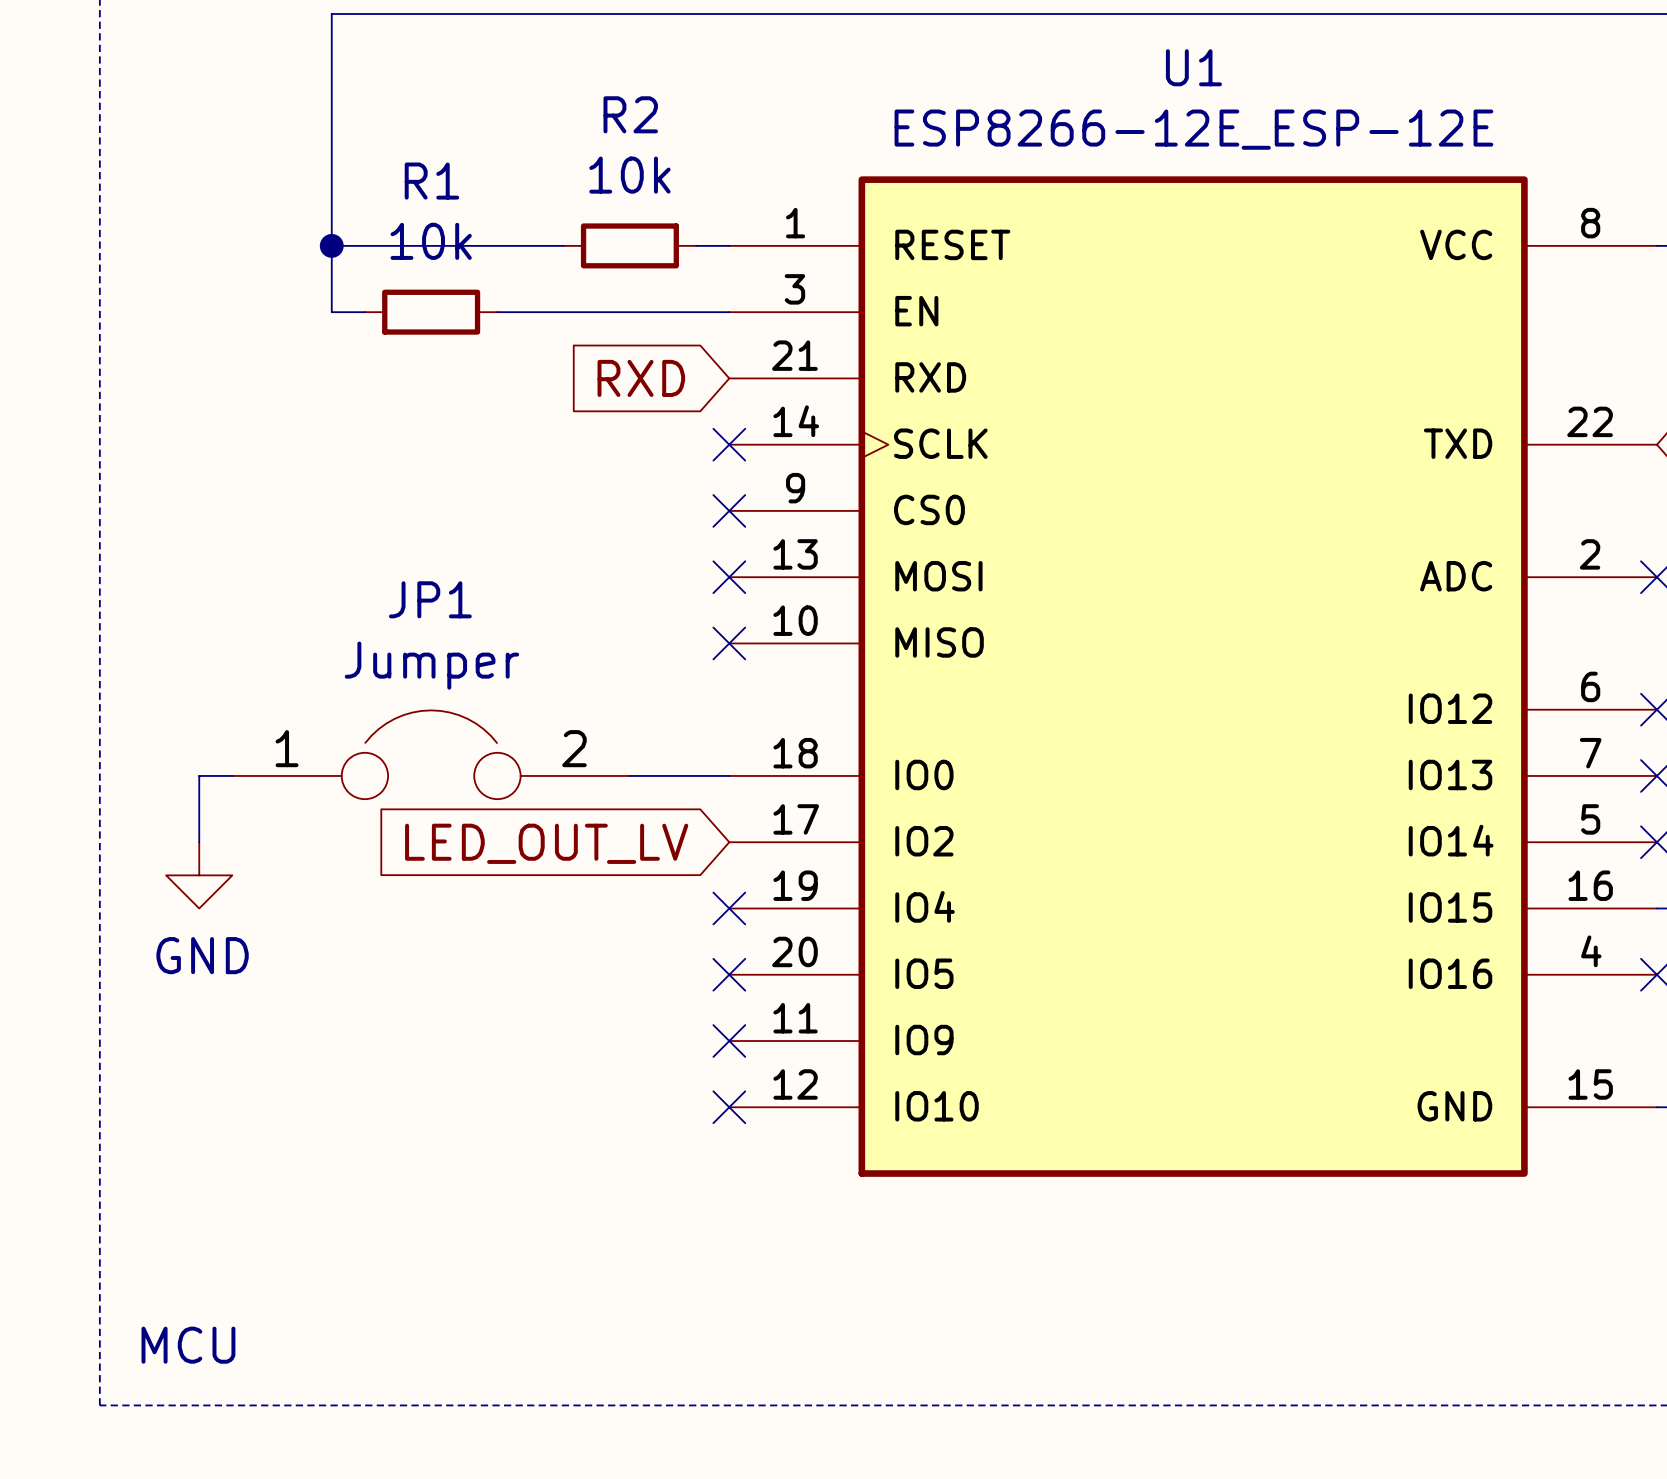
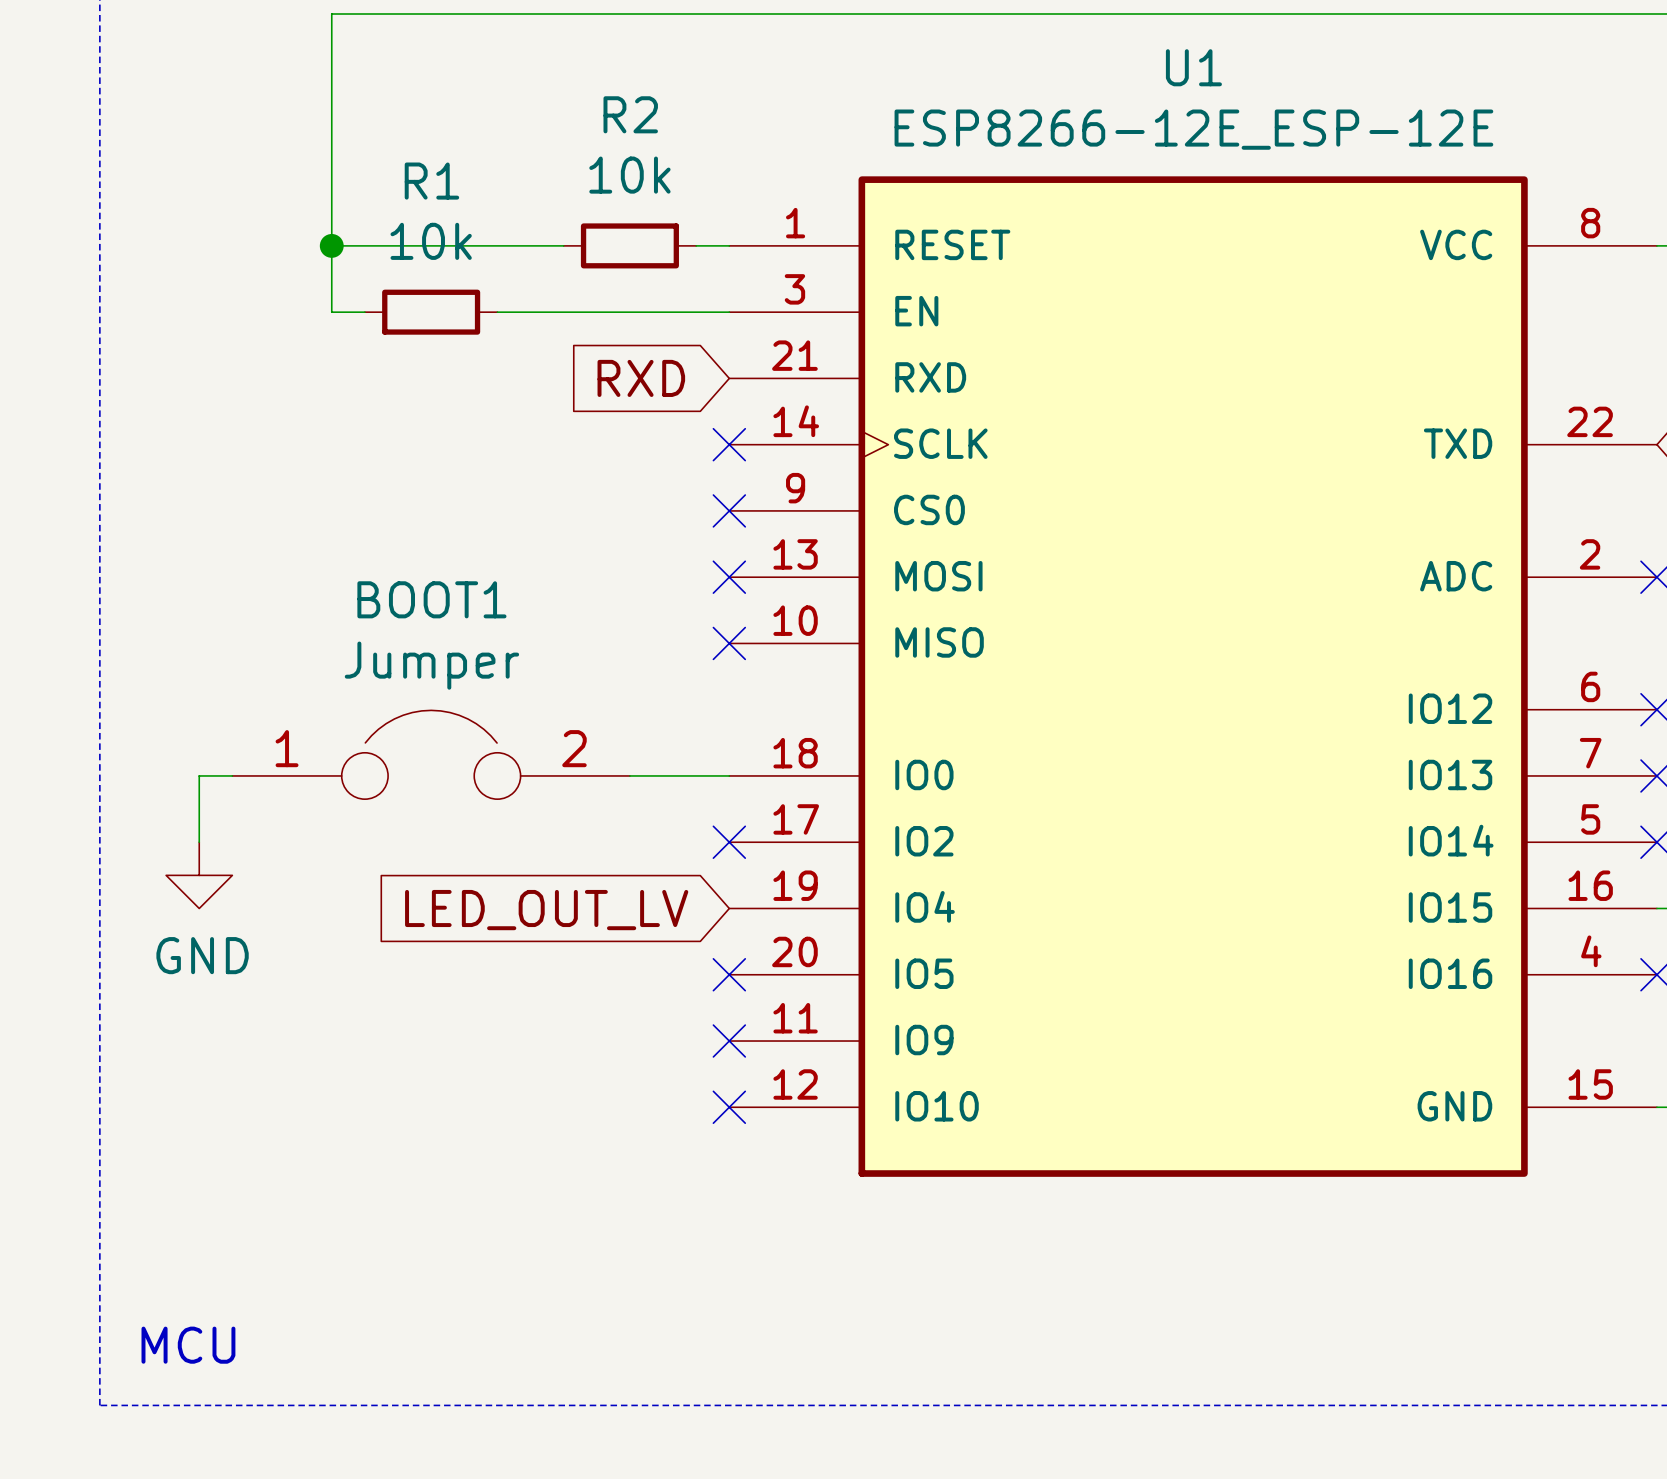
JP1 name: JP1 (430, 599) -> BOOT1 (431, 599)
global label position: LED_OUT_LV (546, 843) -> LED_OUT_LV (546, 910)
no-connect mark position: (729, 908) -> (729, 842)

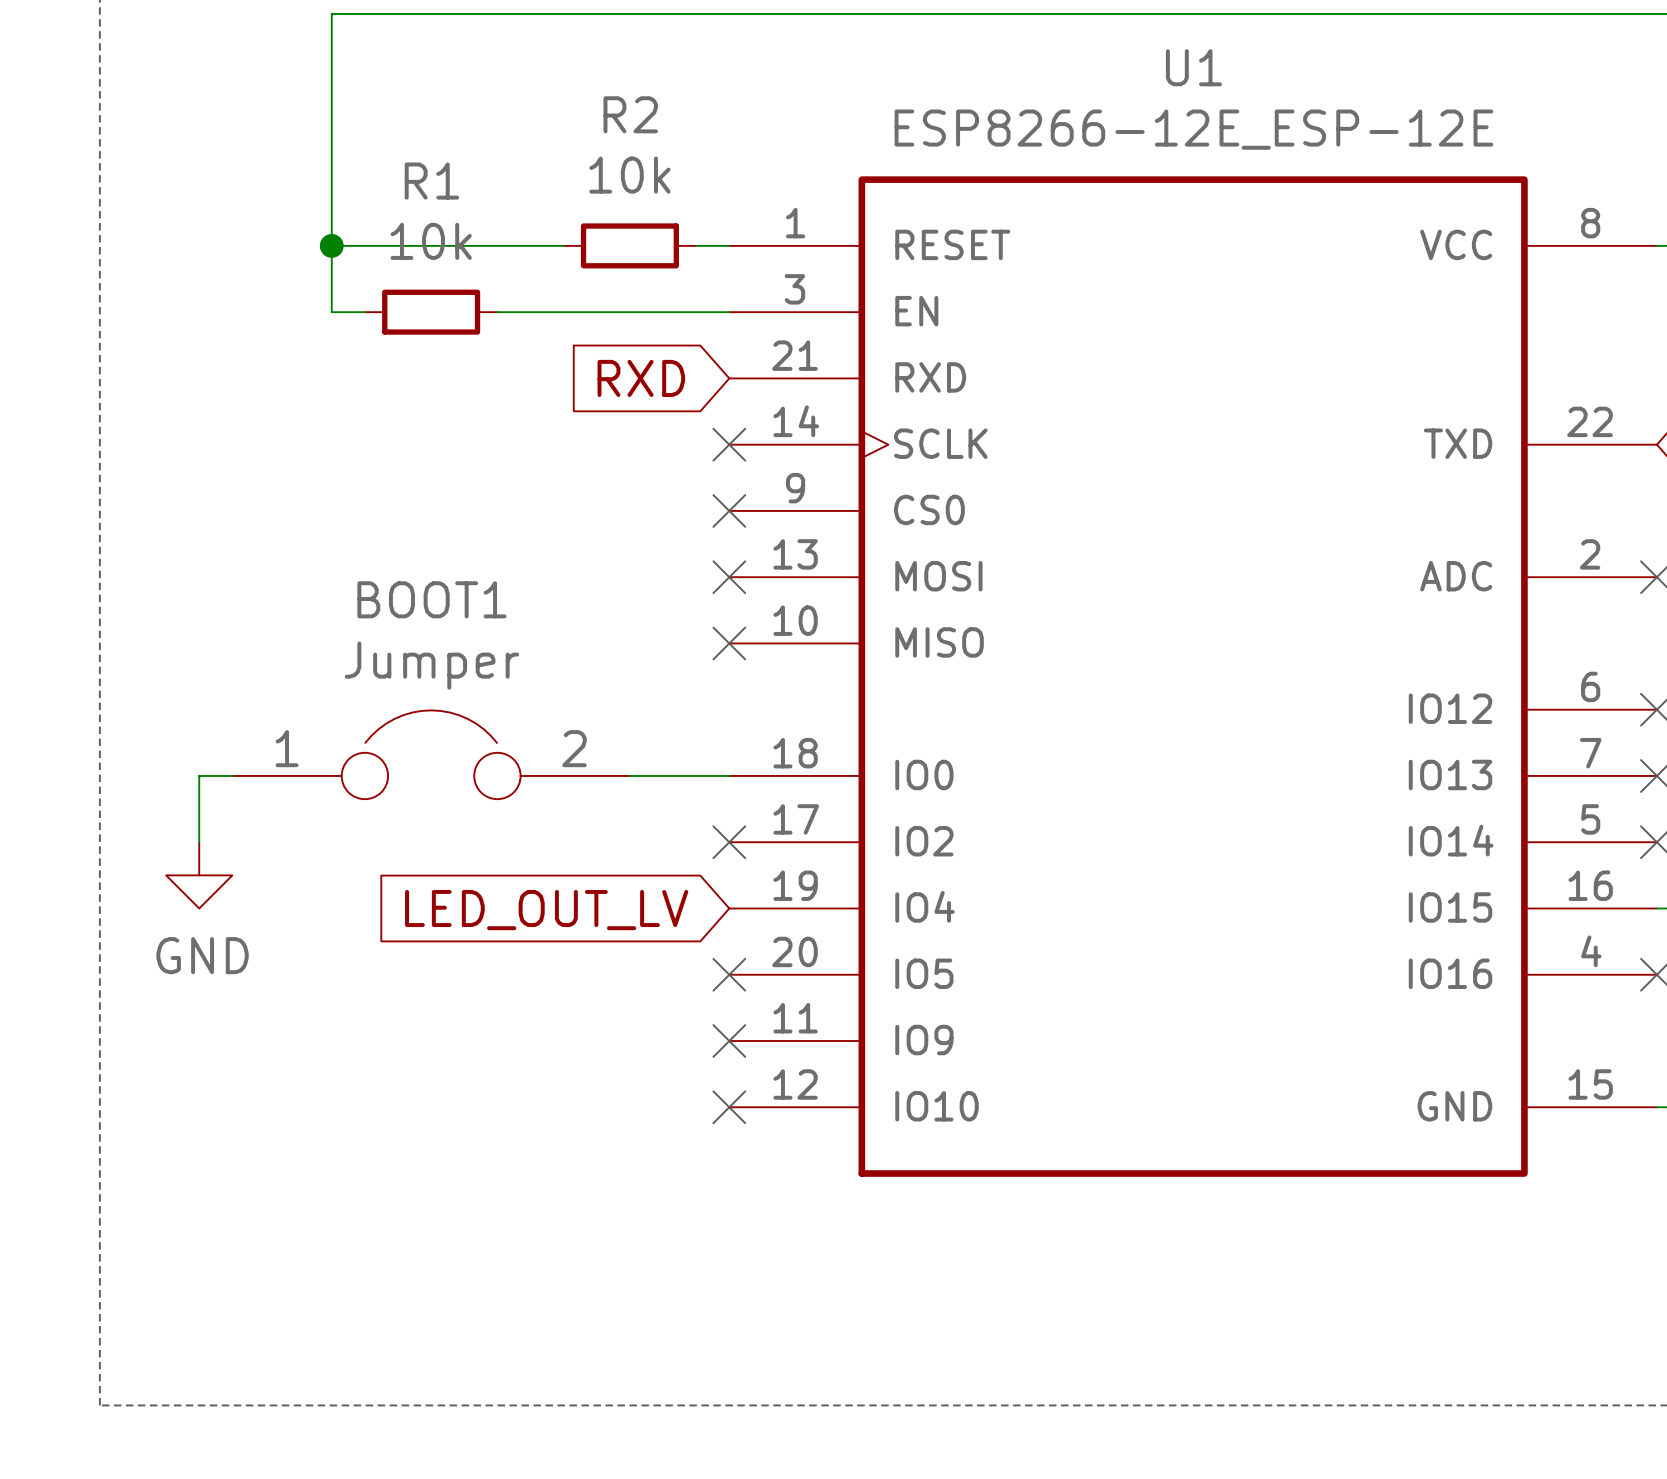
text: MCU (188, 1345) -> none

